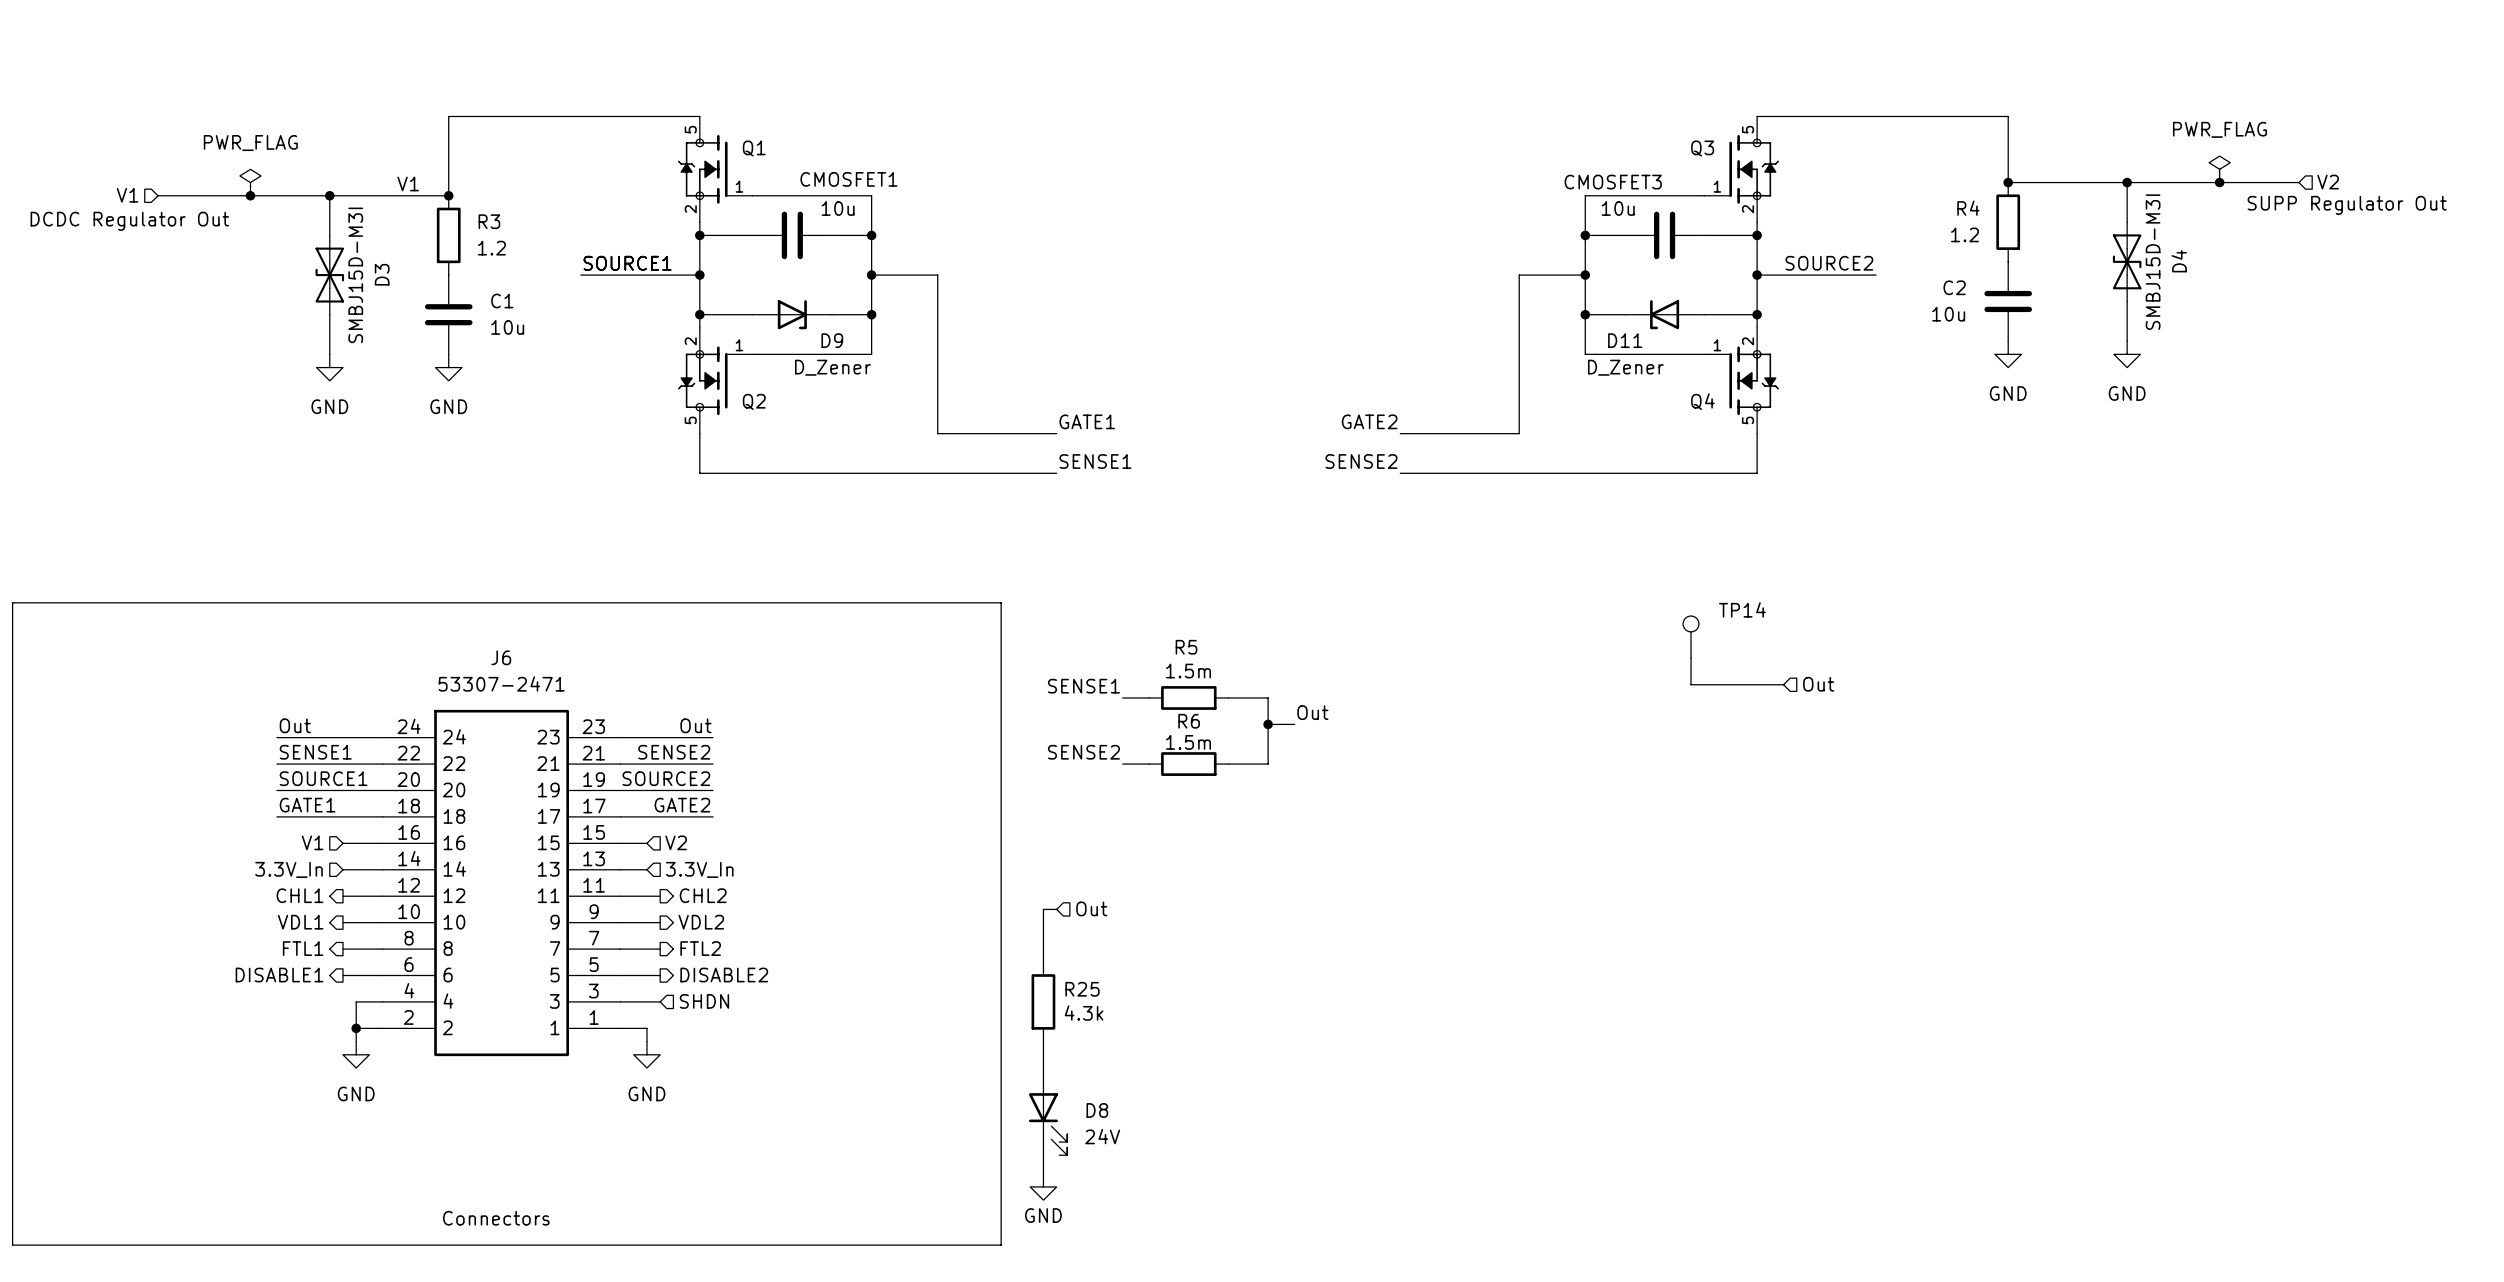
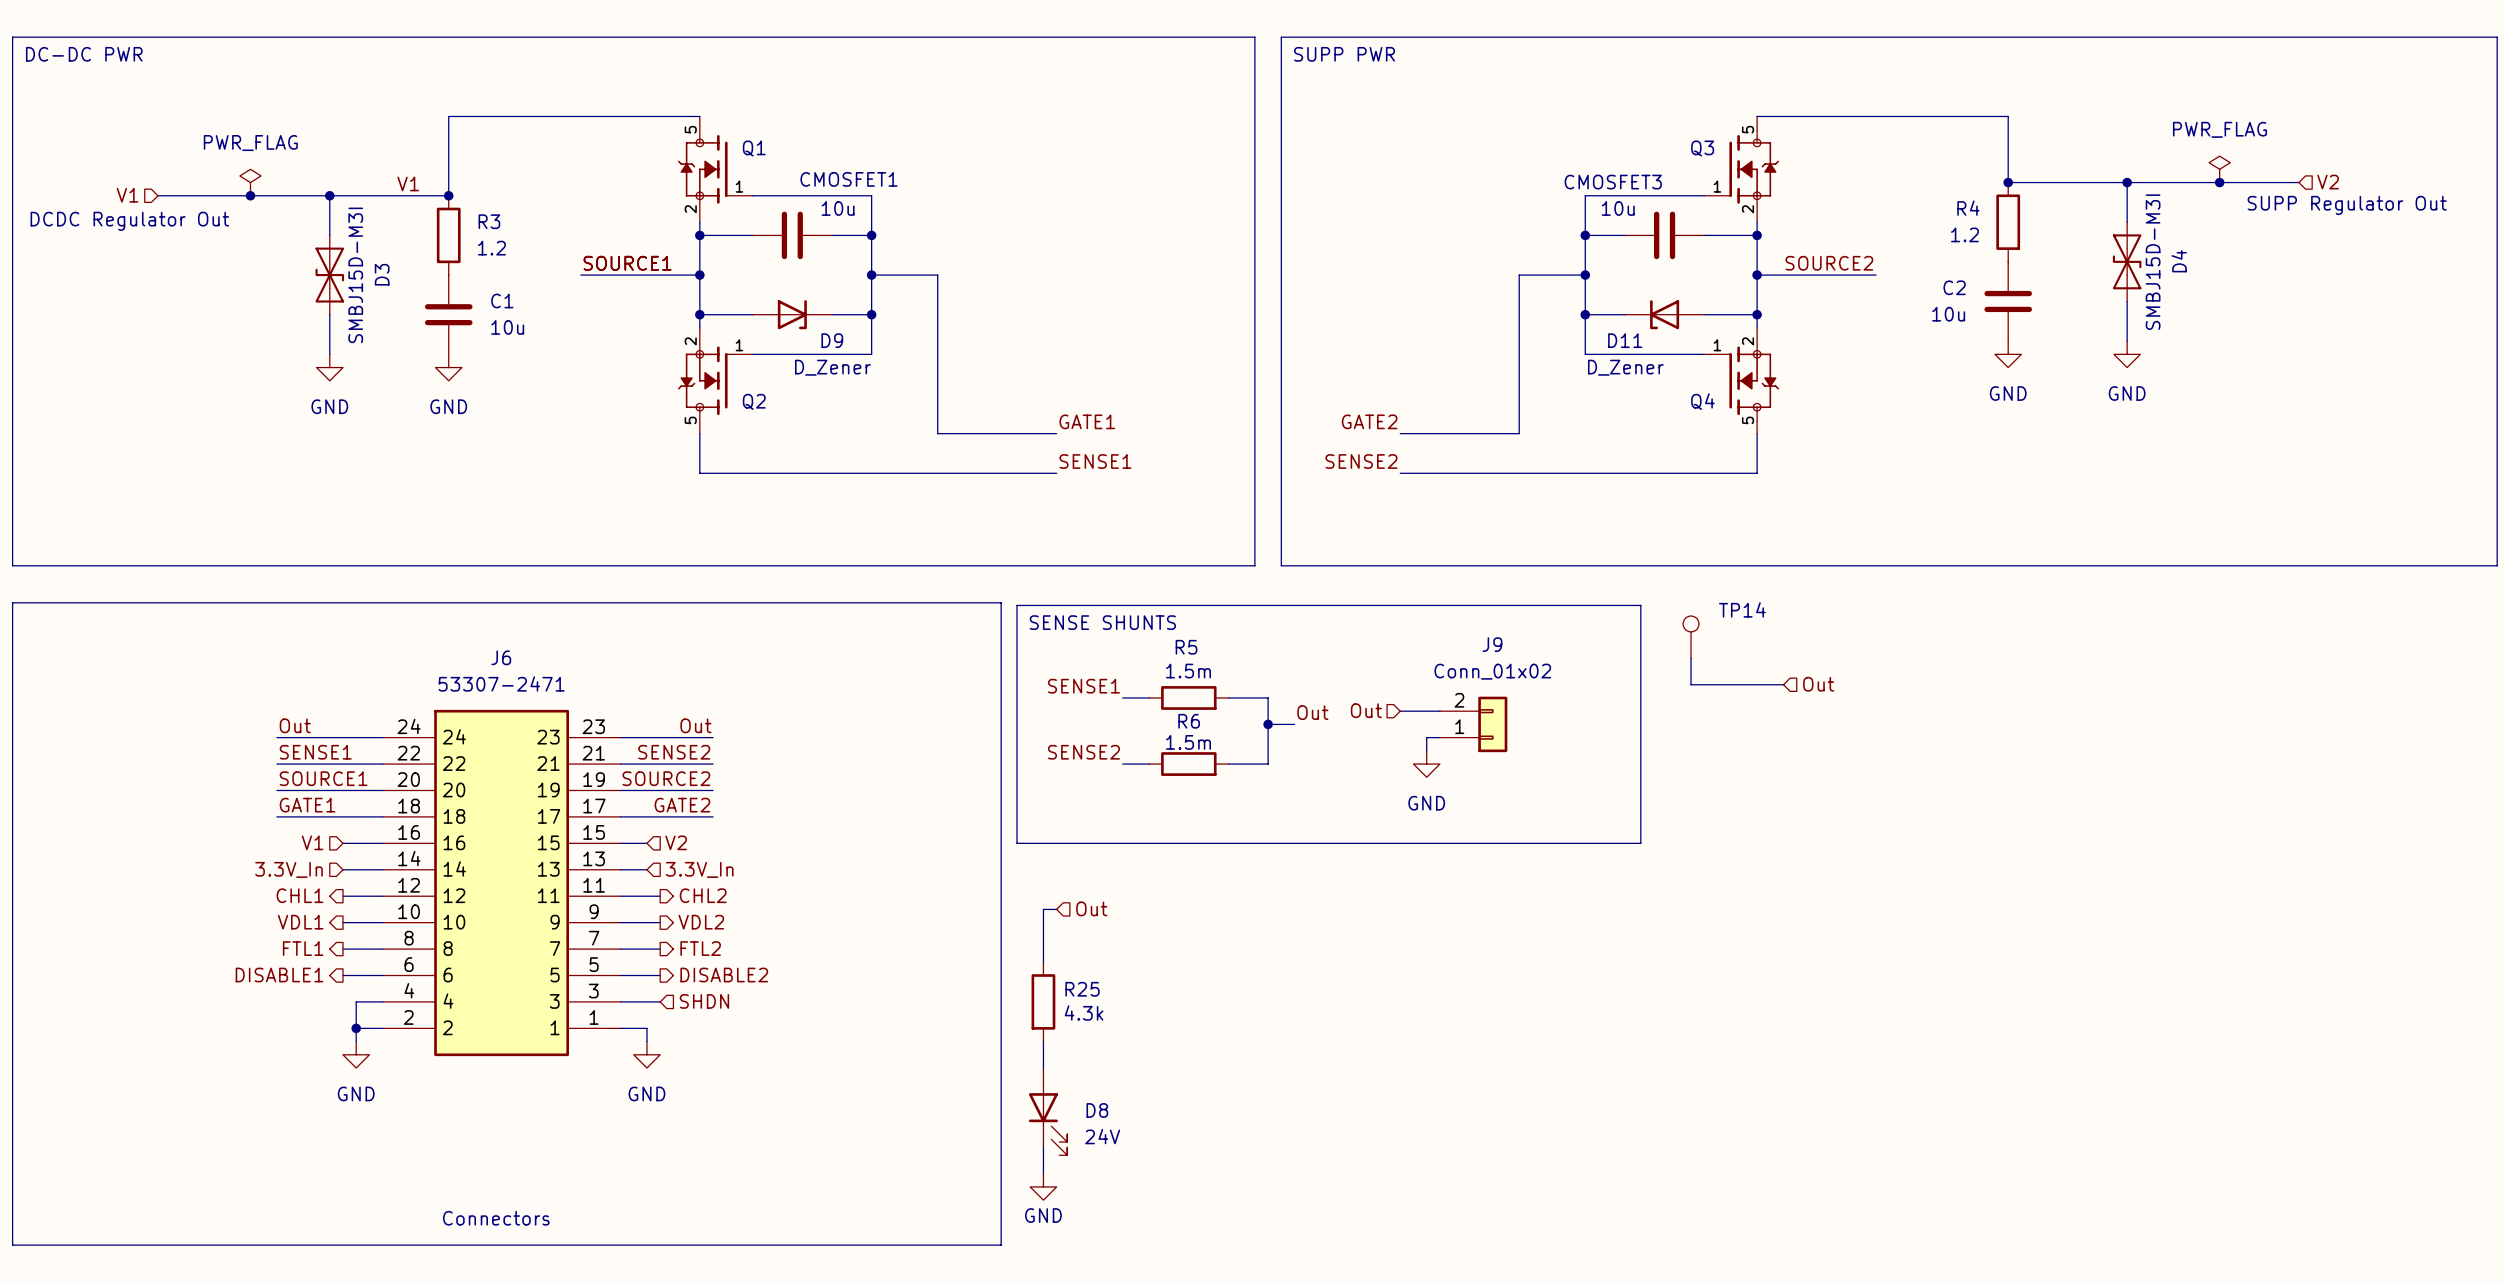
line: none -> (12, 37) (12, 565) (1254, 565) (1254, 37) (12, 37)
line: none -> (1281, 37) (2497, 37) (2497, 565) (1281, 565) (1281, 37)
text: none -> DC-DC PWR (84, 54)
text: none -> SUPP PWR (1344, 54)
line: none -> (1017, 605) (1640, 605) (1640, 843) (1017, 843) (1017, 605)
text: none -> SENSE SHUNTS (1102, 622)
hierarchical label: none -> Out (1366, 710)
wire: none -> (1400, 711) (1439, 711)
J9: none -> Conn_01x02 (1473, 724)
wire: none -> (1439, 737) (1426, 737) (1426, 750)
power symbol: none -> GND (1426, 764)

